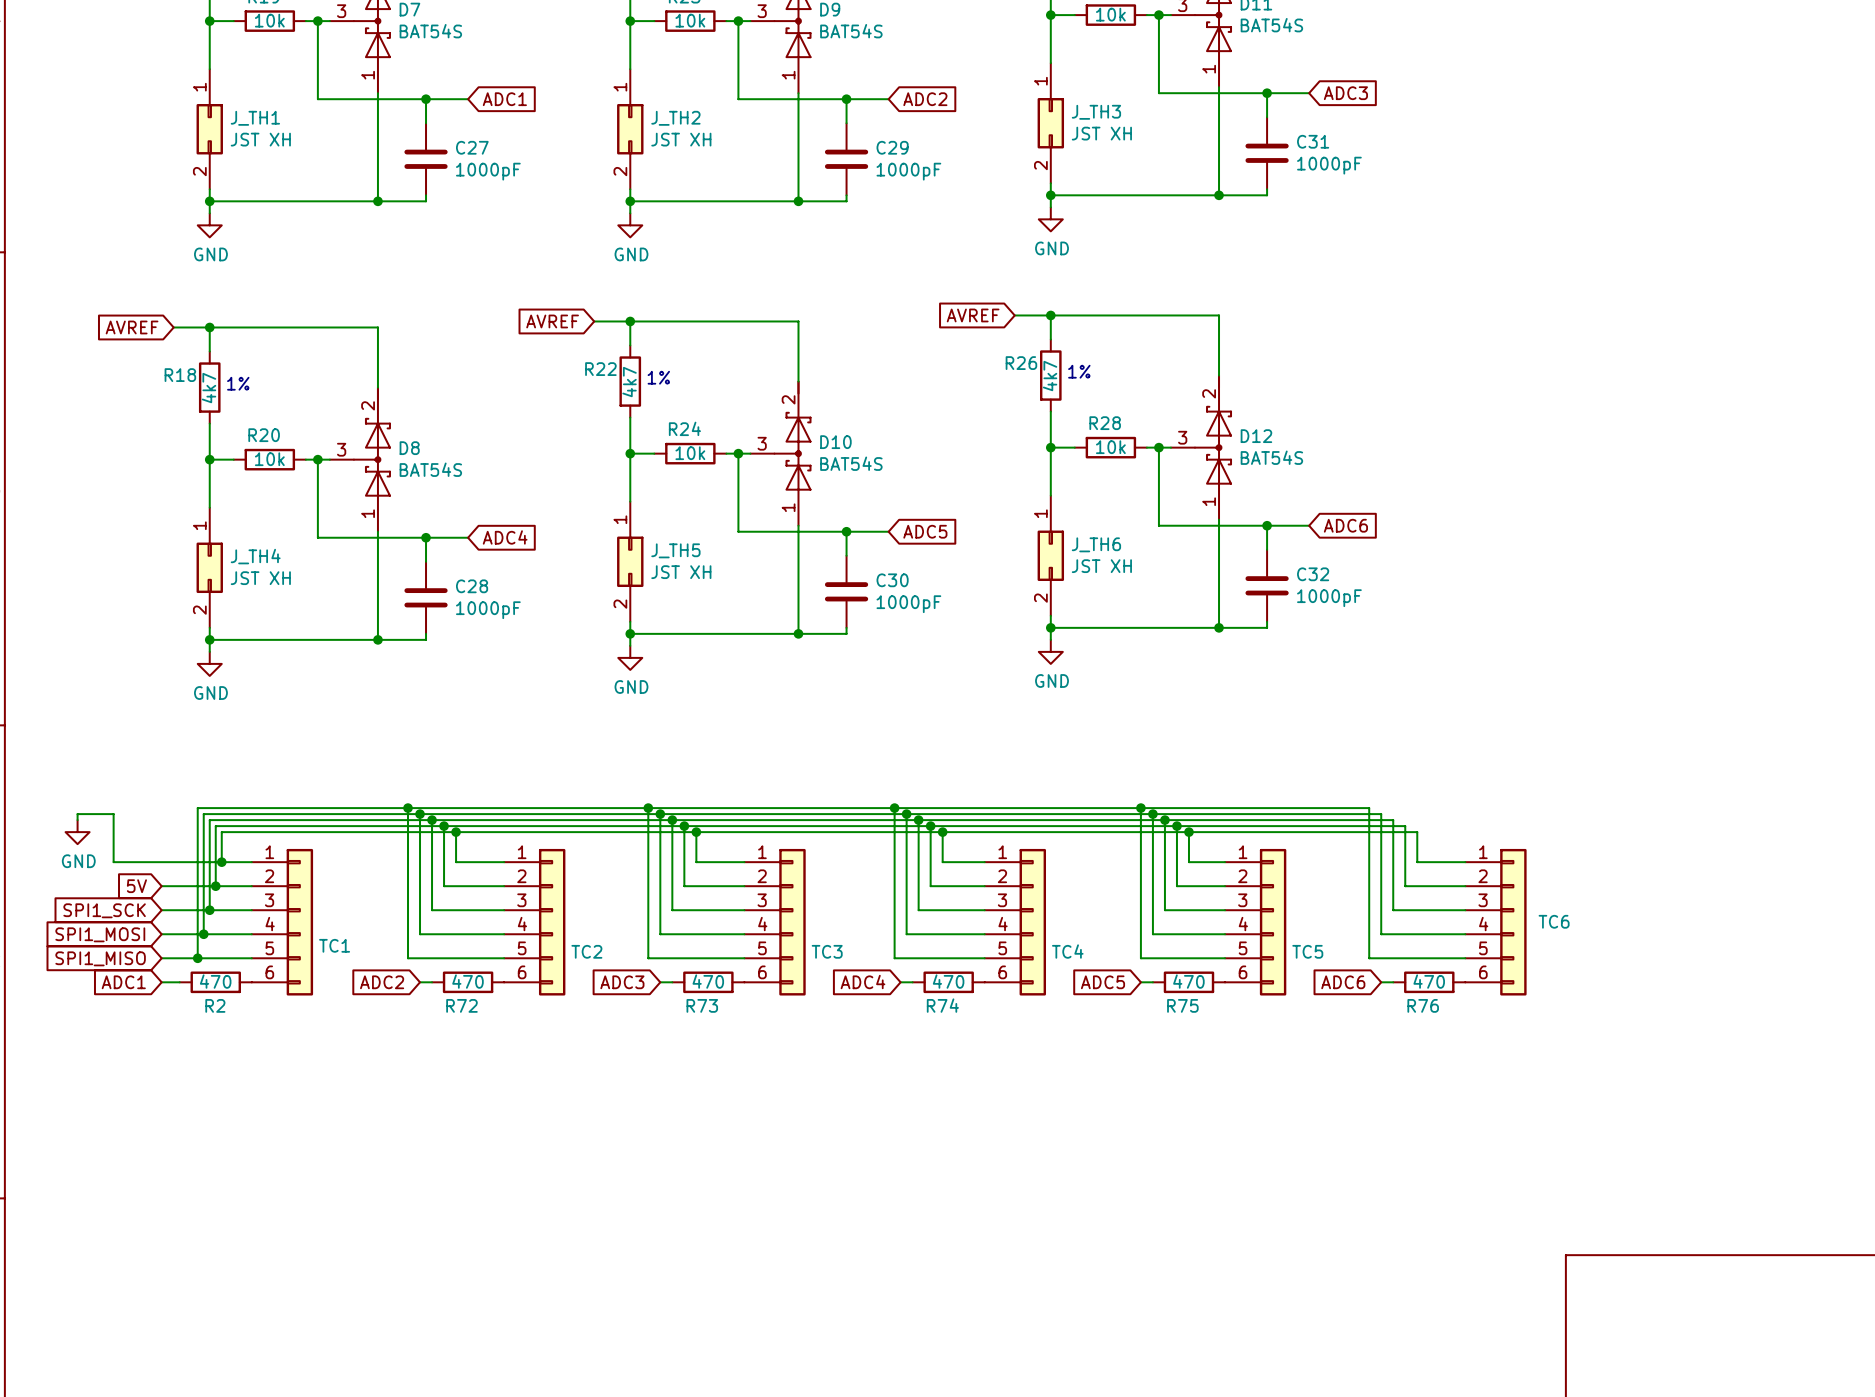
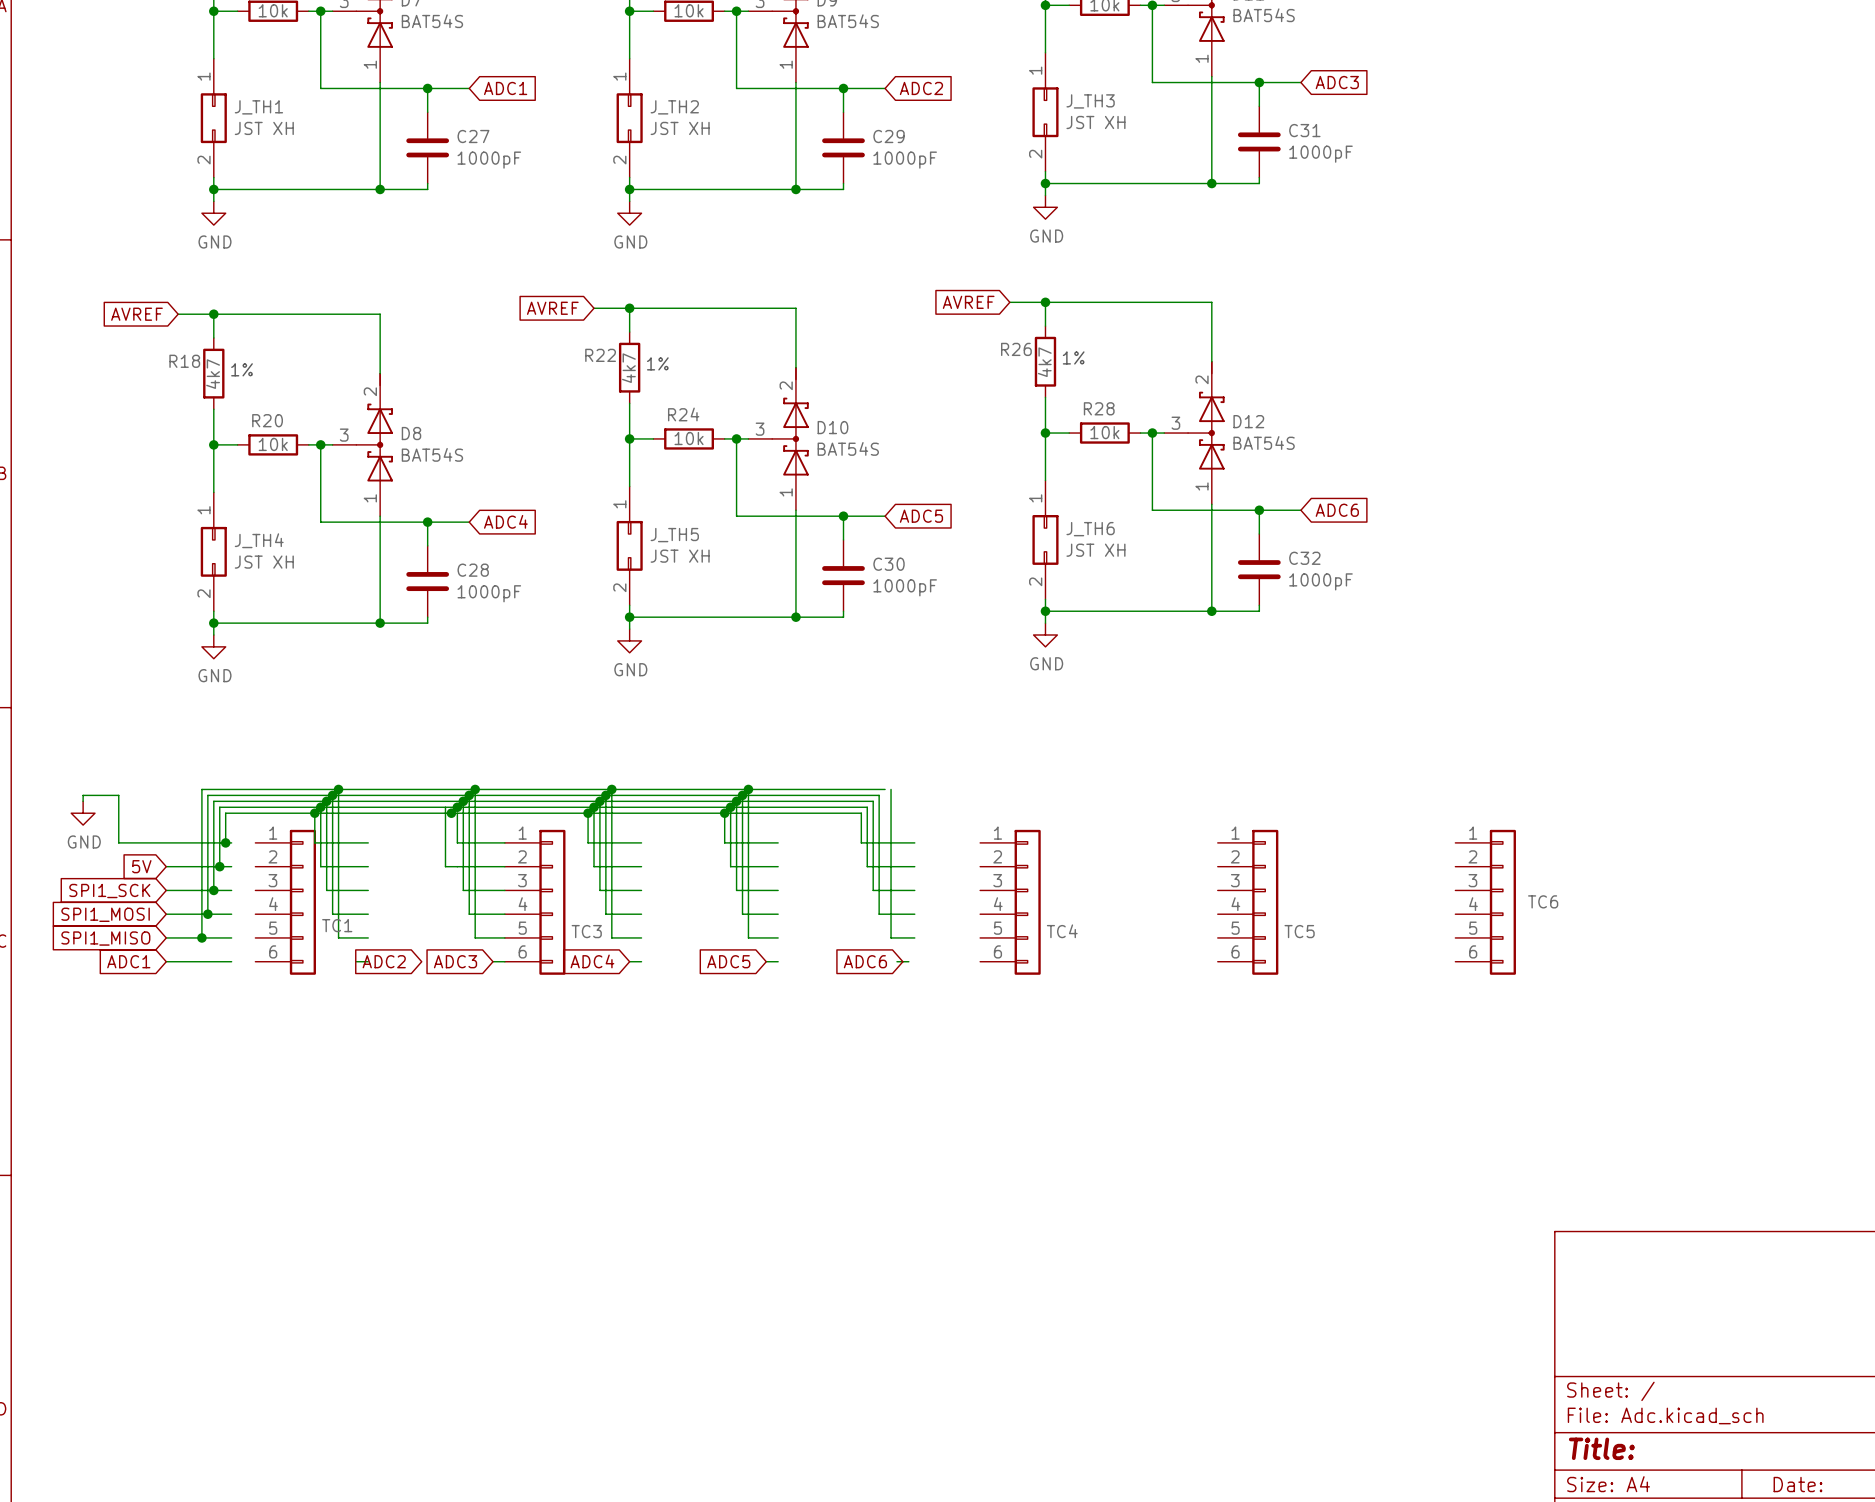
wire: none -> (338, 789) (338, 937) (368, 937)
junction: none -> (338, 789)
wire: (408, 808) (408, 958) (474, 958) -> (475, 789) (475, 937)
junction: (408, 808) -> none
junction: none -> (475, 789)
wire: none -> (611, 789) (611, 937) (641, 937)
junction: none -> (611, 789)
wire: (648, 808) (648, 958) (744, 958) -> none
junction: (648, 808) -> none
wire: none -> (748, 789) (748, 937) (778, 937)
junction: none -> (748, 789)
wire: (888, 808) (1369, 808) (1369, 958) (1465, 958) -> none
junction: (894, 808) -> none
wire: (1140, 808) (1140, 958) (1225, 958) -> none
junction: (1140, 808) -> none
wire: none -> (332, 795) (332, 914) (368, 914)
junction: none -> (332, 795)
wire: (420, 814) (420, 934) (468, 934) -> (469, 795) (469, 914)
junction: (420, 814) -> none
junction: none -> (469, 795)
wire: none -> (605, 795) (605, 914) (641, 914)
junction: none -> (605, 795)
wire: (660, 814) (660, 934) (744, 934) -> none
junction: (660, 814) -> none
wire: none -> (742, 795) (742, 914) (778, 914)
junction: none -> (742, 795)
wire: (882, 814) (1381, 814) (1381, 934) (1465, 934) -> none
wire: (906, 814) (906, 934) -> (879, 795) (879, 914) (902, 914)
junction: (906, 814) -> none
wire: (1152, 814) (1152, 934) (1225, 934) -> none
junction: (1152, 814) -> none
wire: none -> (326, 801) (326, 890) (368, 890)
junction: none -> (326, 801)
wire: (432, 820) (432, 910) (462, 910) -> (463, 801) (463, 890)
junction: (432, 820) -> none
junction: none -> (463, 801)
wire: none -> (599, 801) (599, 890) (641, 890)
junction: none -> (599, 801)
wire: (672, 820) (672, 910) (738, 910) -> (736, 801) (736, 890)
junction: (672, 820) -> none
junction: none -> (736, 801)
wire: (876, 820) (1393, 820) (1393, 910) (1465, 910) -> (873, 801) (873, 890) (914, 890)
wire: (918, 820) (918, 910) (984, 910) -> none
junction: (918, 820) -> none
wire: (1164, 820) (1164, 910) (1225, 910) -> none
junction: (1164, 820) -> none
wire: none -> (320, 807) (320, 866) (368, 866)
junction: none -> (320, 807)
junction: (444, 826) -> none
junction: none -> (457, 807)
wire: none -> (593, 807) (593, 866) (641, 866)
junction: none -> (593, 807)
wire: (684, 826) (684, 886) (732, 886) -> (730, 807) (730, 866)
junction: (684, 826) -> none
junction: none -> (730, 807)
wire: (870, 826) (1405, 826) (1405, 886) (1465, 886) -> (867, 807) (867, 866) (914, 866)
wire: (930, 826) (930, 886) (984, 886) -> none
junction: (930, 826) -> none
wire: (1176, 826) (1176, 886) (1225, 886) -> none
junction: (1176, 826) -> none
wire: none -> (314, 813) (314, 842) (368, 842)
junction: none -> (314, 813)
junction: none -> (451, 813)
junction: (456, 832) -> none
wire: none -> (588, 813) (588, 842) (641, 842)
junction: none -> (588, 813)
wire: (696, 832) (696, 862) (726, 862) -> (724, 813) (724, 842)
junction: (696, 832) -> none
junction: none -> (724, 813)
wire: (864, 832) (1417, 832) (1417, 862) (1465, 862) -> (861, 813) (861, 842) (914, 842)
wire: (942, 832) (942, 862) (984, 862) -> none
junction: (942, 832) -> none
wire: (1188, 832) (1188, 862) (1225, 862) -> none
junction: (1188, 832) -> none
wire: (227, 862) (251, 862) -> none
wire: (227, 886) (251, 886) -> none
wire: (227, 910) (251, 910) -> none
TC3: (775, 922) -> none
wire: (227, 934) (251, 934) -> none
wire: (918, 934) (984, 934) -> none
TC2 name: TC2 (586, 951) -> TC3 (586, 931)
wire: (227, 958) (251, 958) -> none
wire: (918, 958) (984, 958) -> none
wire: none -> (184, 961) (231, 961)
R2: 470 (215, 982) -> none
wire: (420, 982) (432, 982) -> (356, 961) (368, 961)
R72: 470 (468, 982) -> none
global label: none -> ADC4 (592, 961)
global label position: ADC3 (622, 982) -> ADC3 (455, 961)
wire: (660, 982) (672, 982) -> (629, 961) (641, 961)
R73: 470 (708, 982) -> none
global label: none -> ADC5 (728, 961)
global label: ADC4 (862, 982) -> ADC6 (865, 961)
R74: 470 (948, 982) -> none
global label: ADC5 (1103, 982) -> none
wire: (1140, 982) (1152, 982) -> none
R75: 470 (1188, 982) -> none
global label: ADC6 (1343, 982) -> none
wire: (1381, 982) (1393, 982) -> none
R76: 470 (1429, 982) -> none

